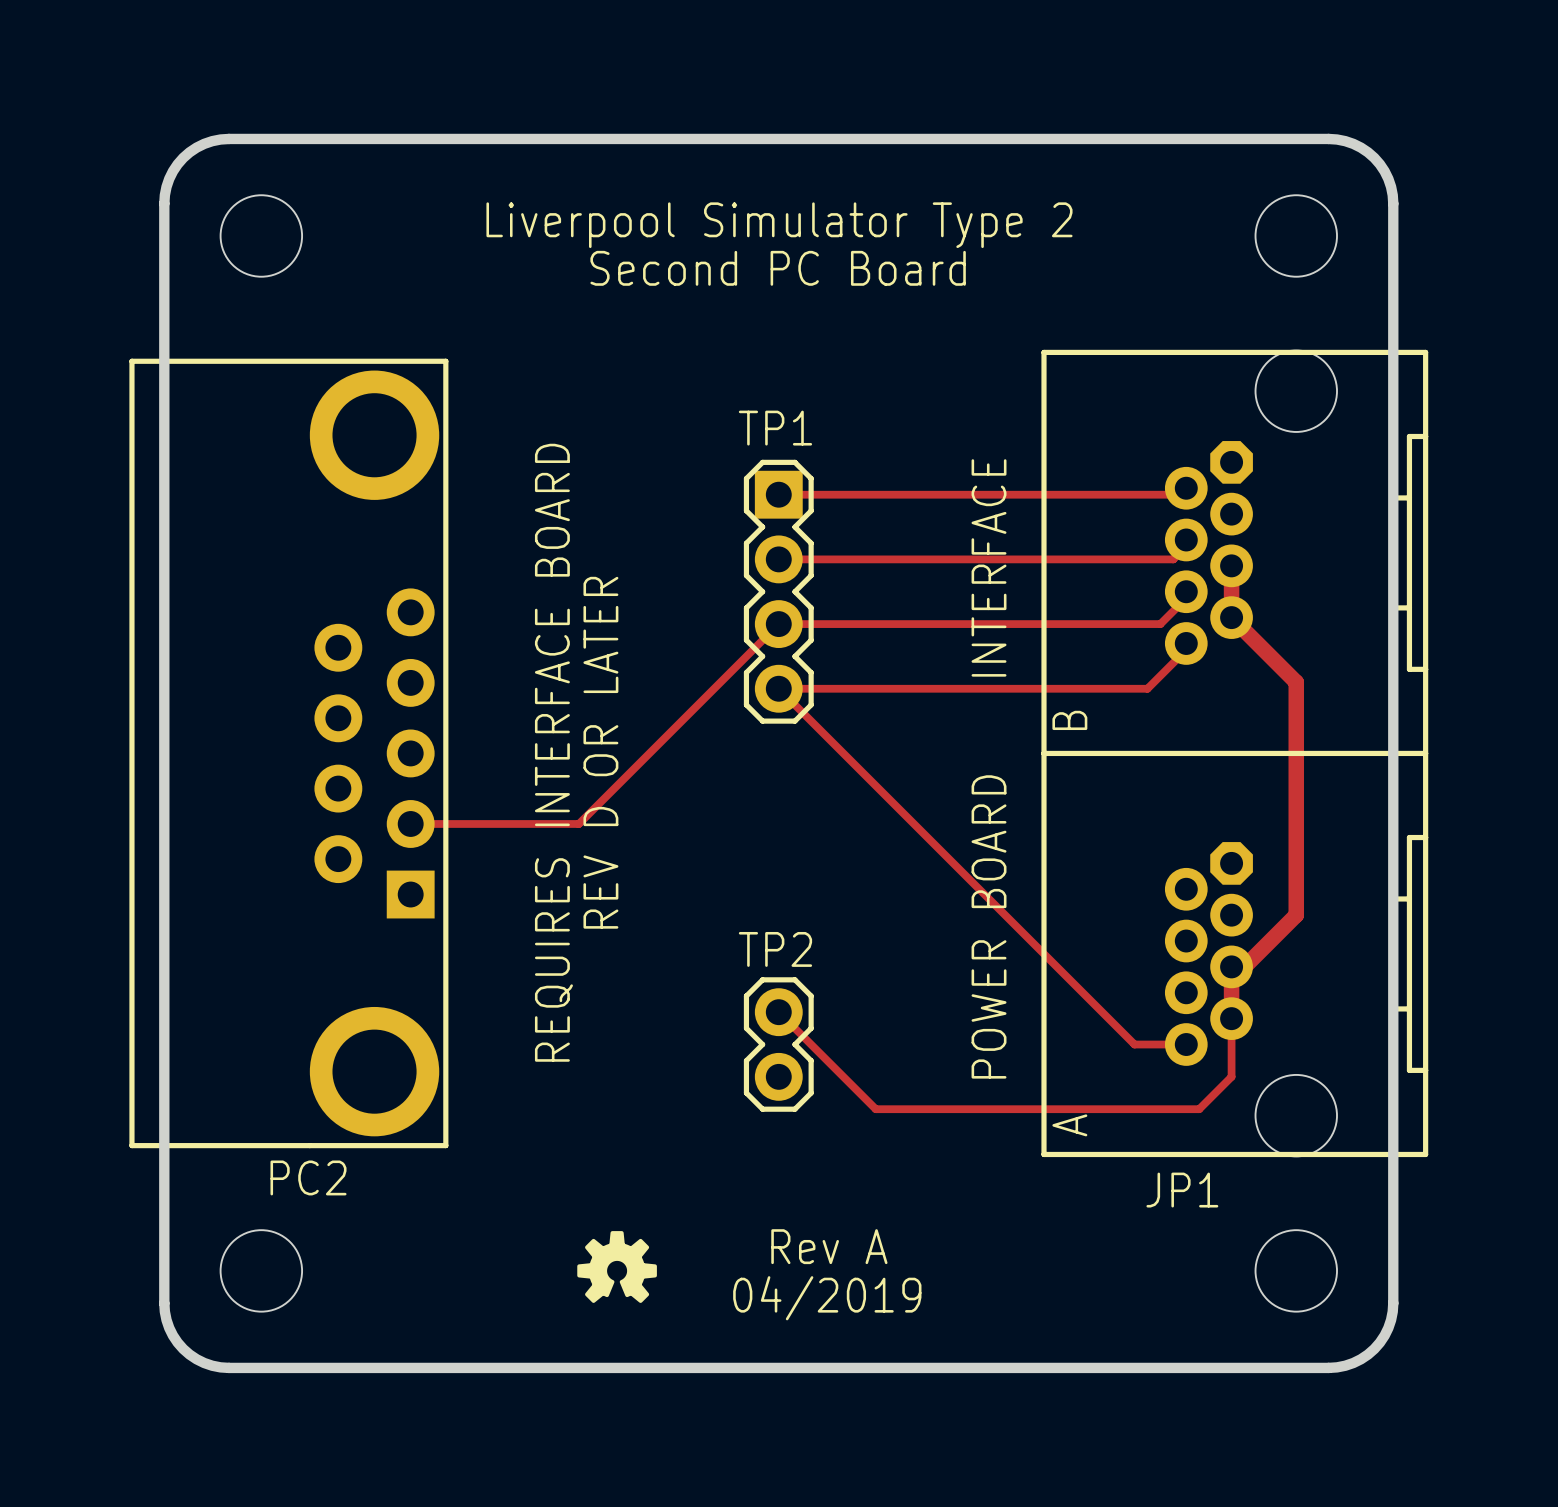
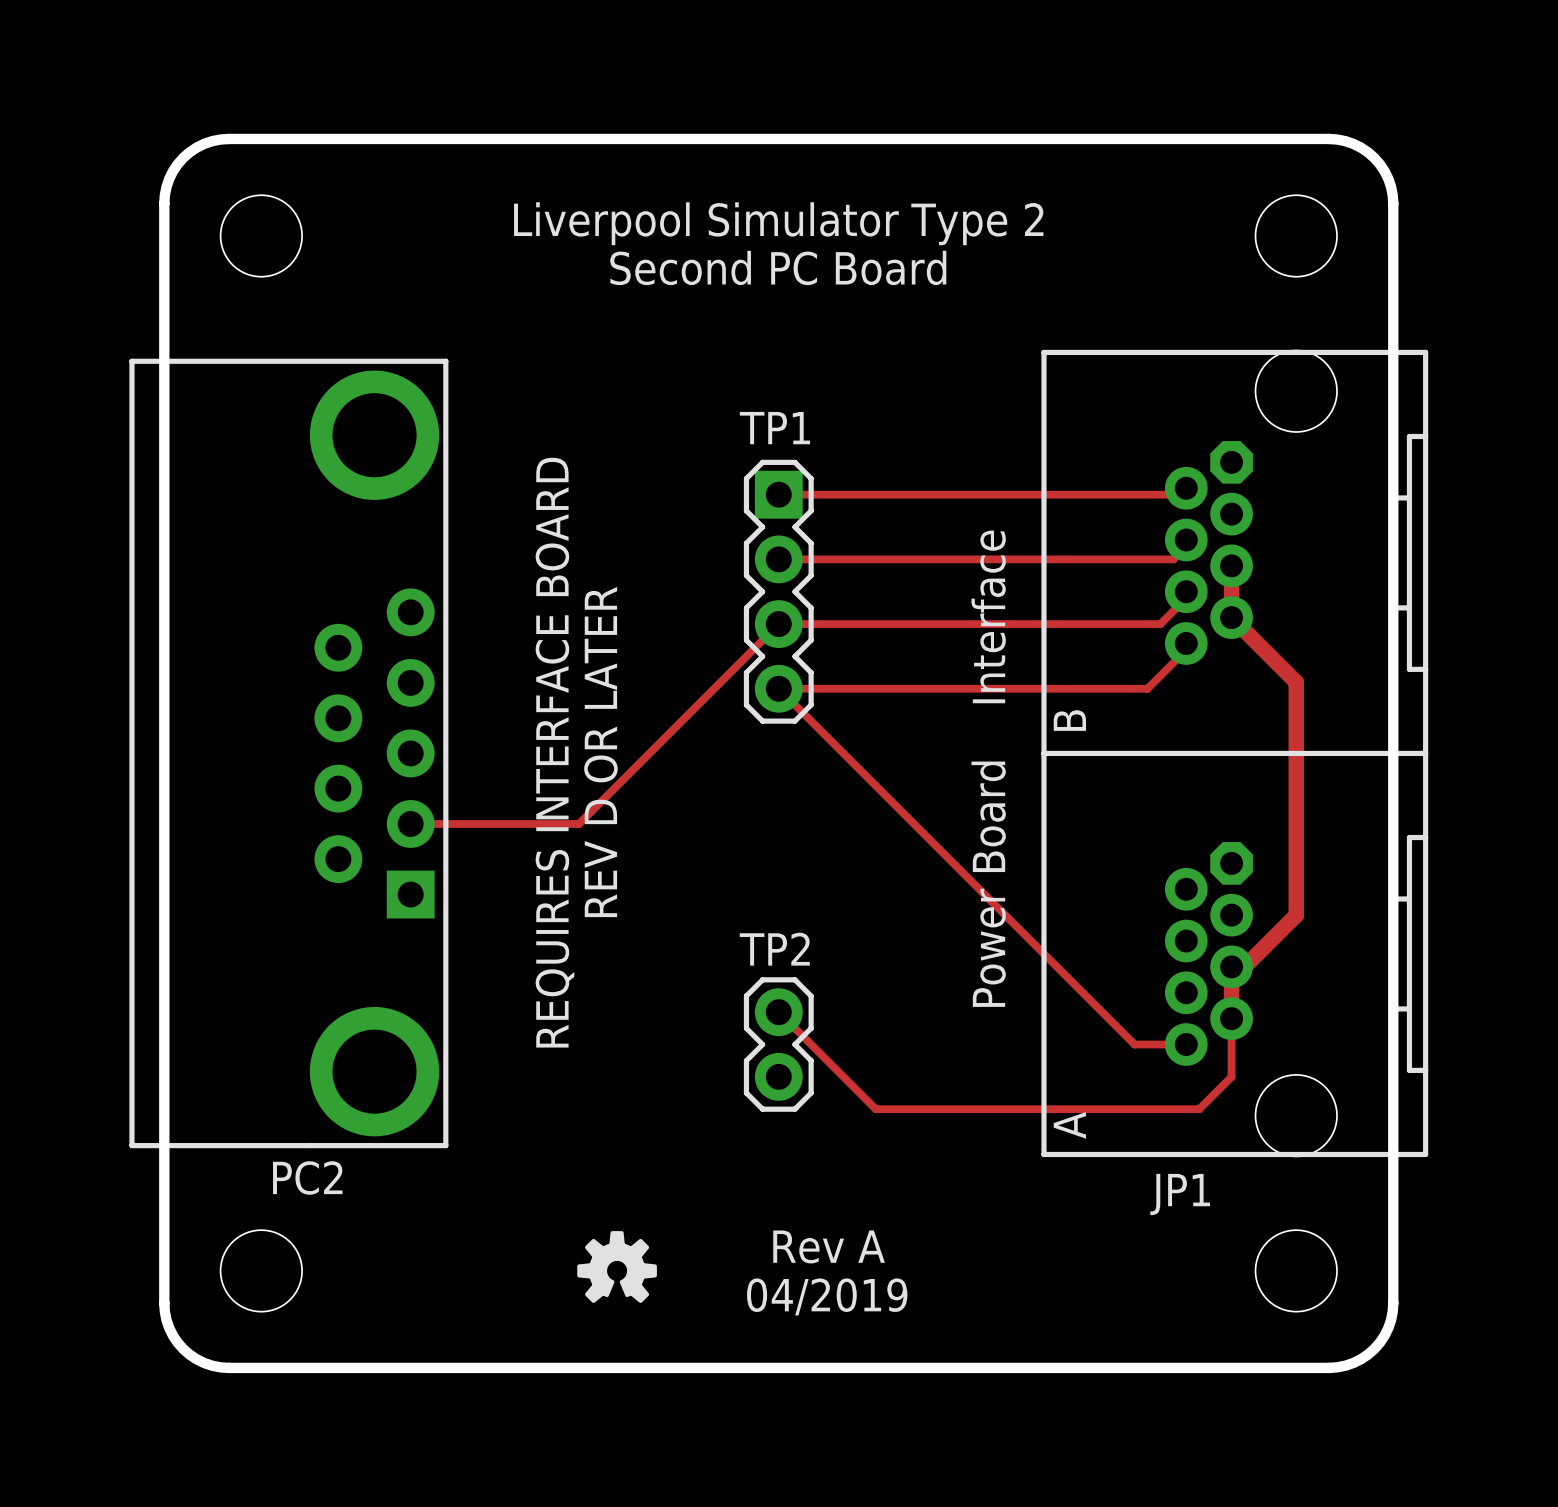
text: POWER BOARD INTERFACE (989, 768) -> Power Board Interface (988, 768)

